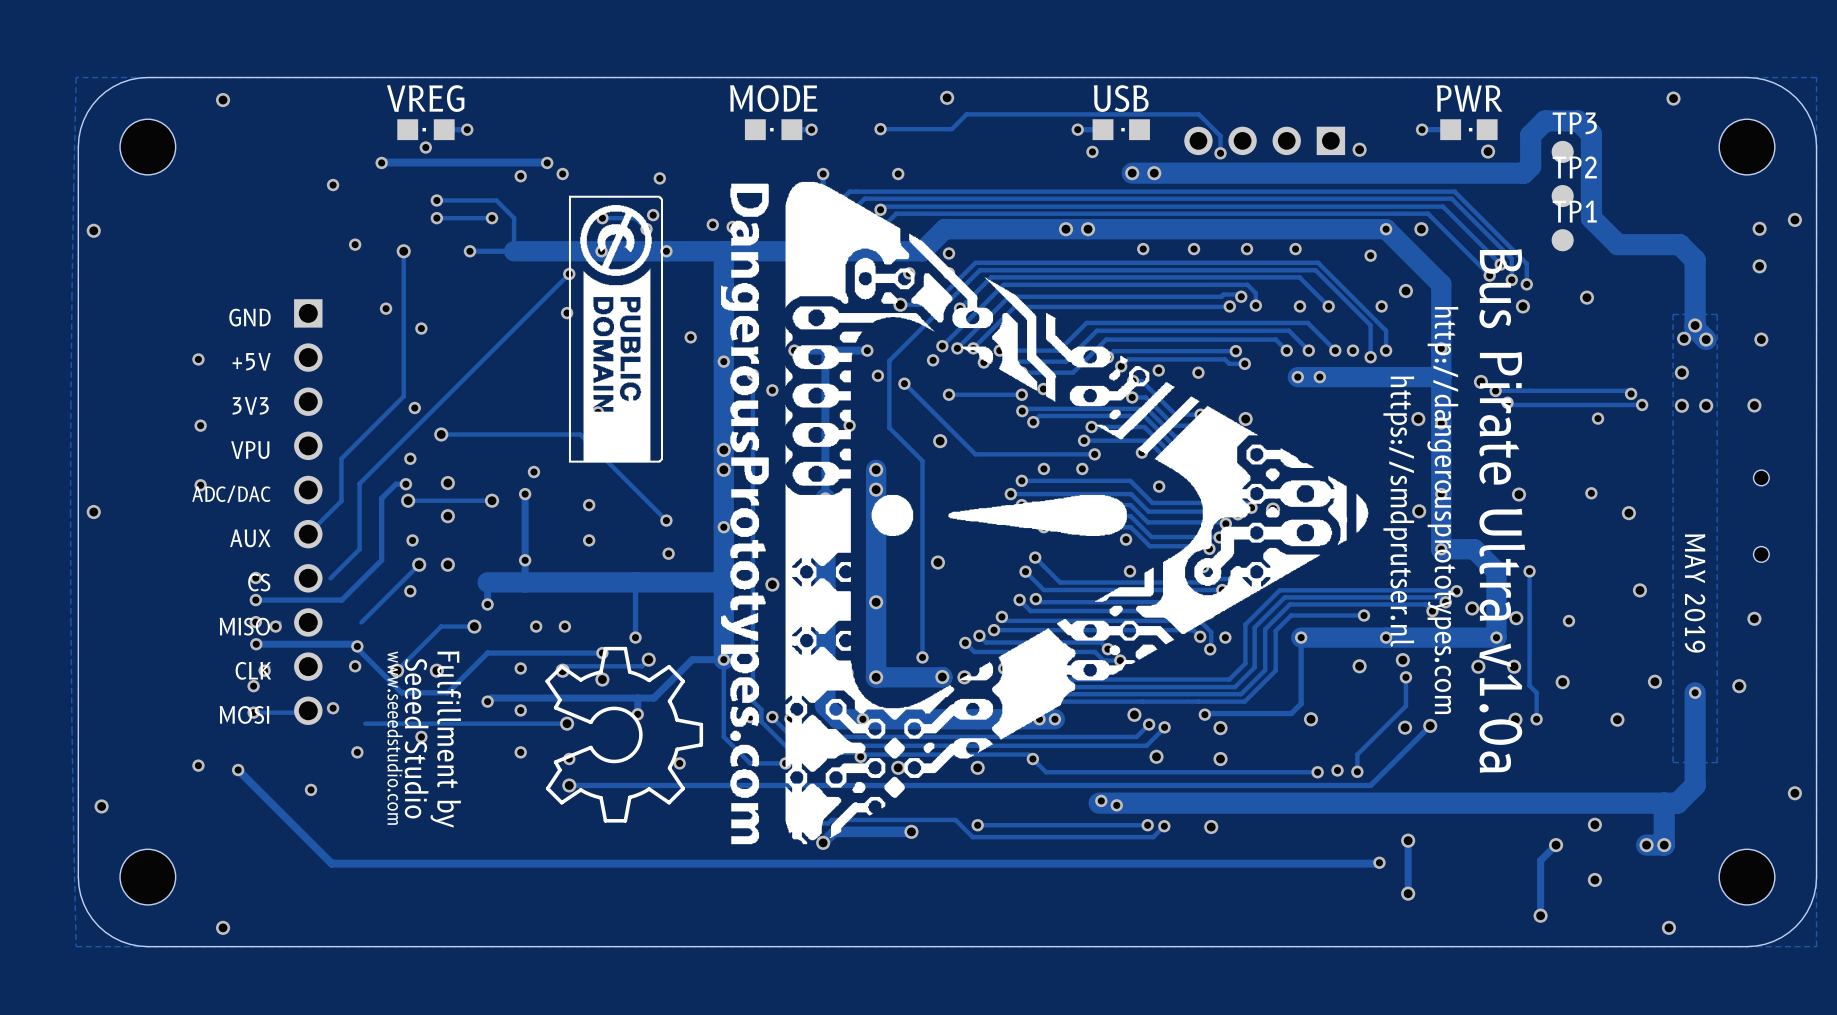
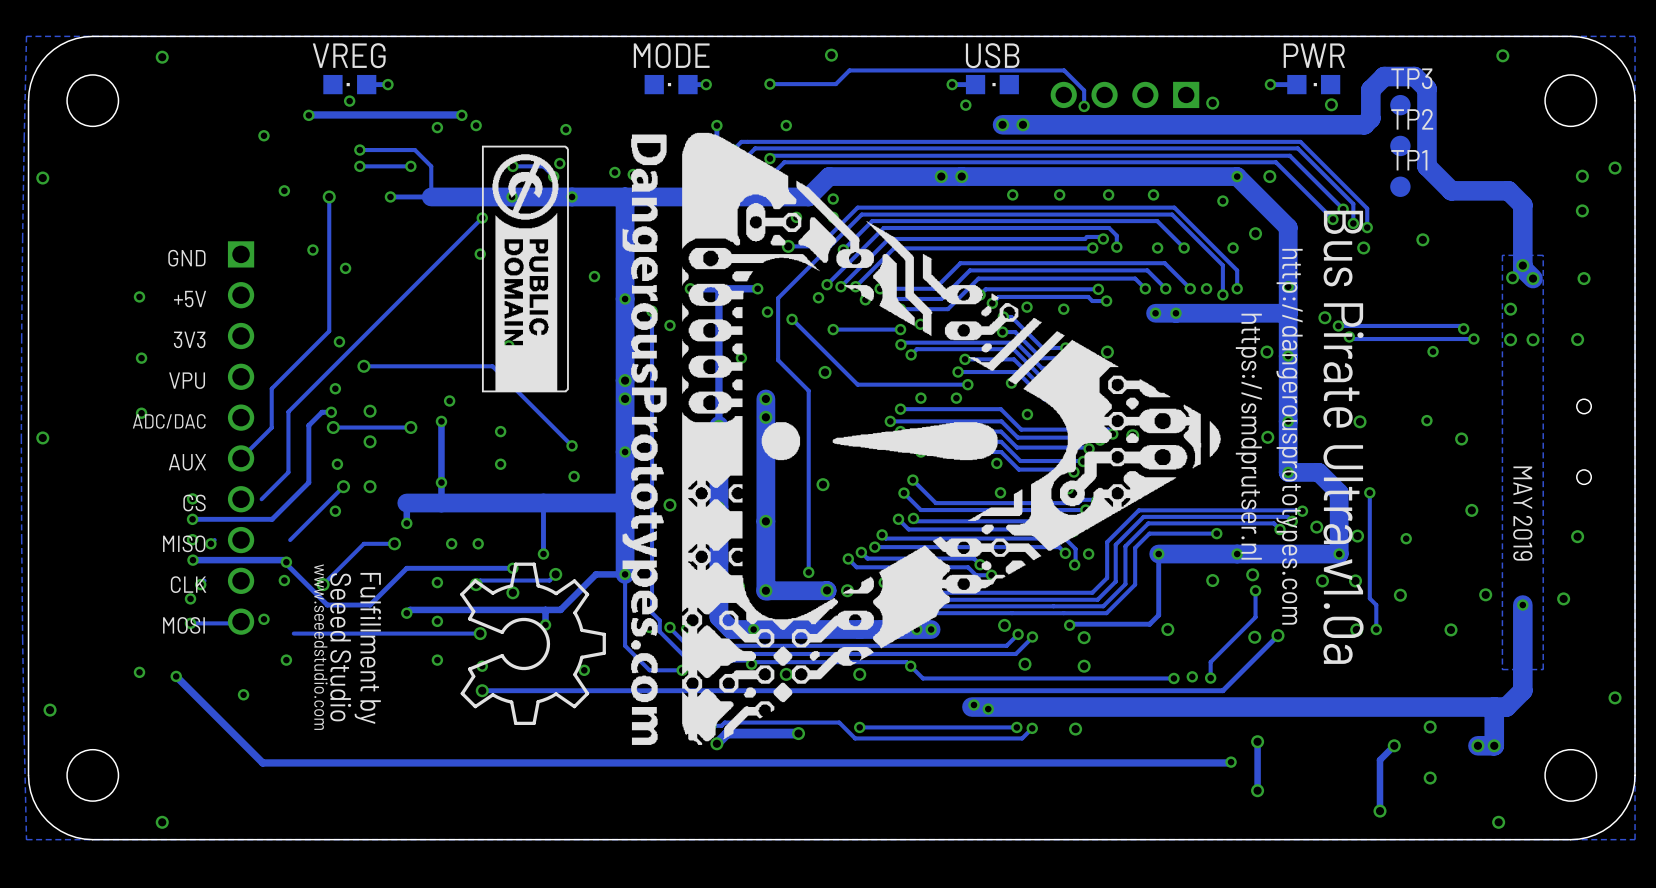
via: (436, 670) -> none
via: (421, 736) -> none

